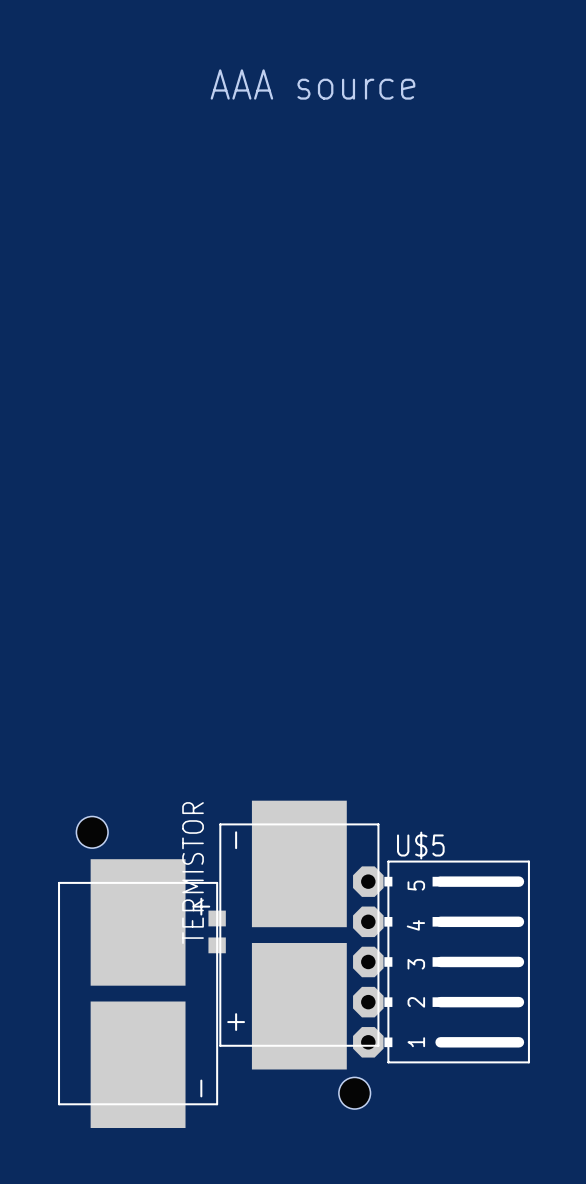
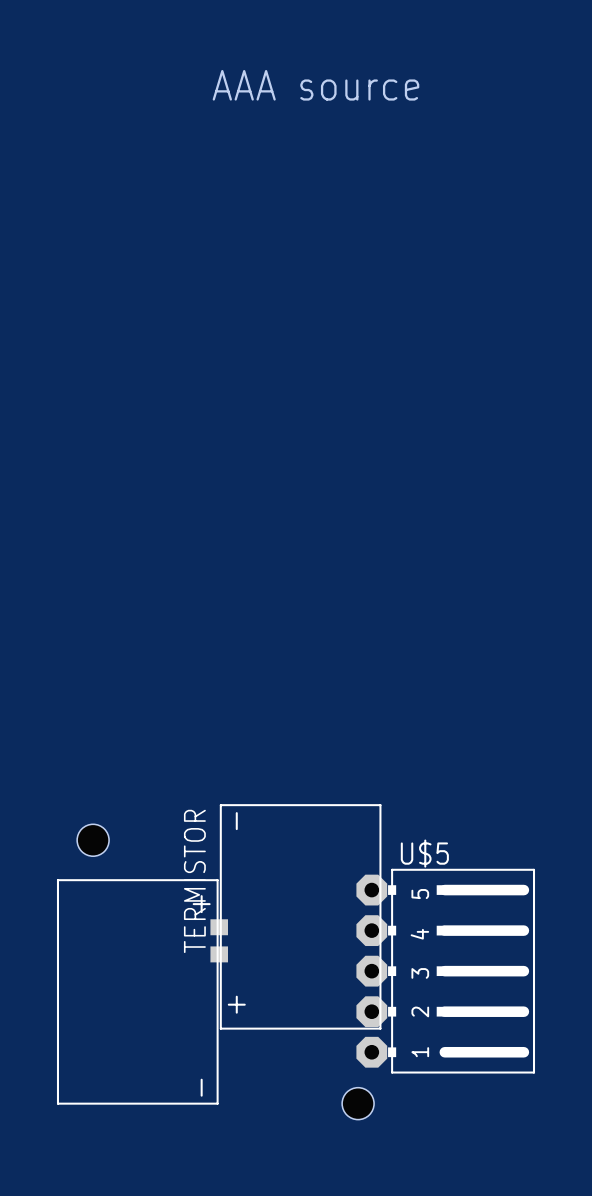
part footprint: [58, 859, 219, 1129] -> [56, 879, 219, 1105]
part: none -> (300, 916)
part: (299, 935) -> none

